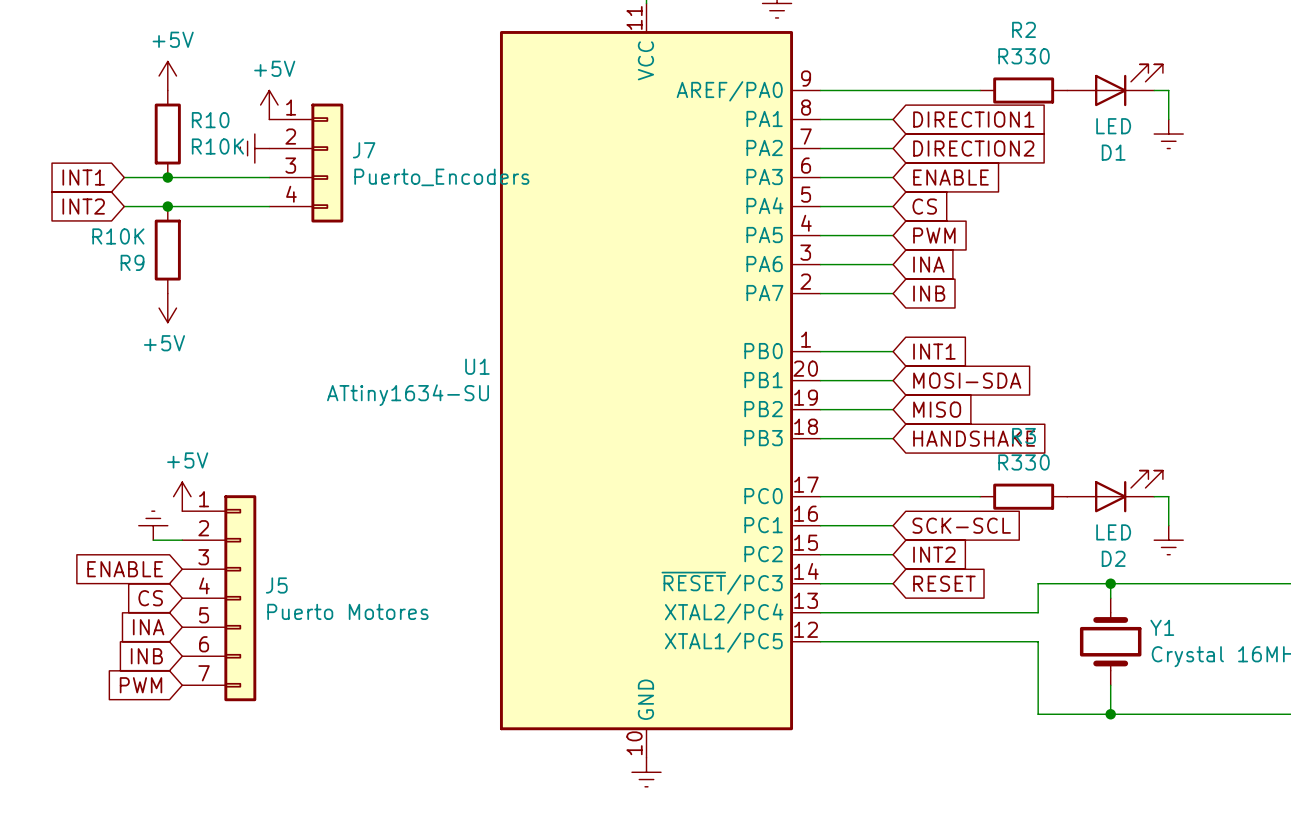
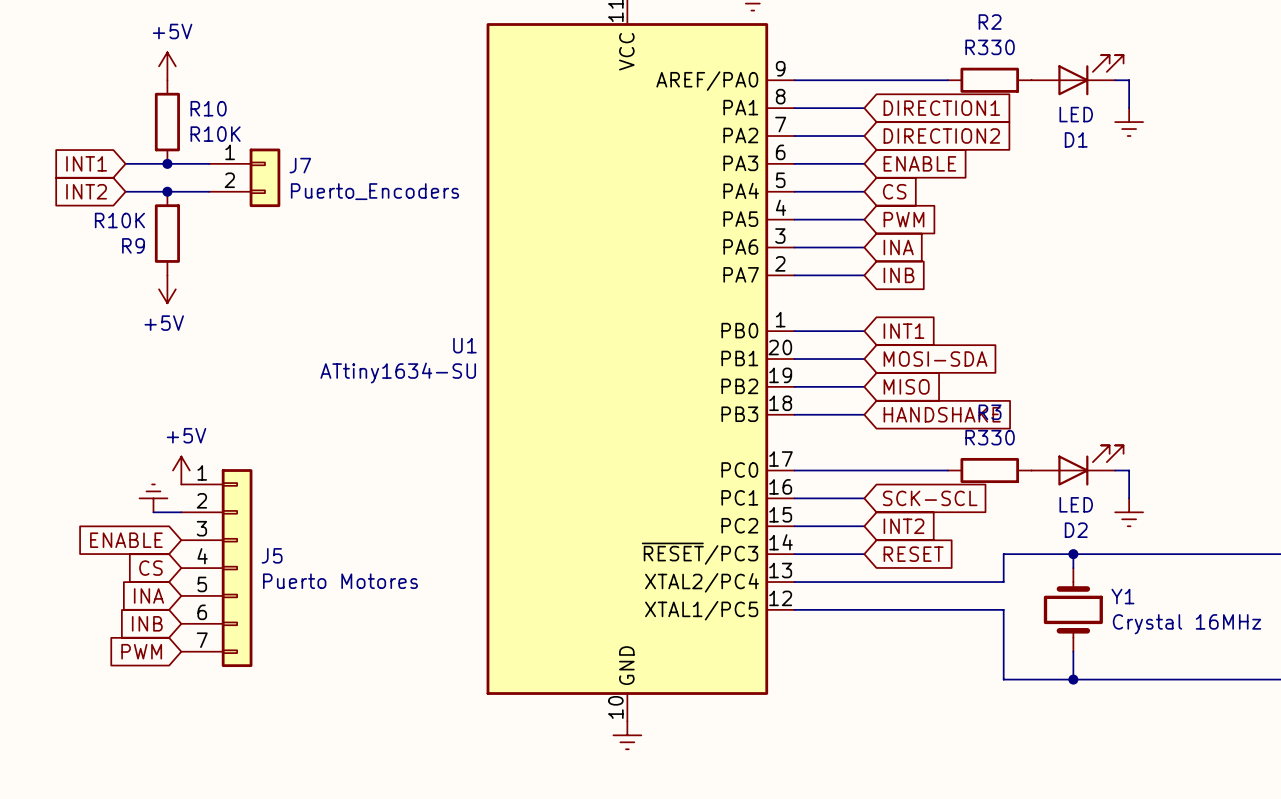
J7 symbol: [269, 103, 344, 223] -> [209, 148, 281, 208]
power symbol: +5V (269, 105) -> none
power symbol: (254, 148) -> none

